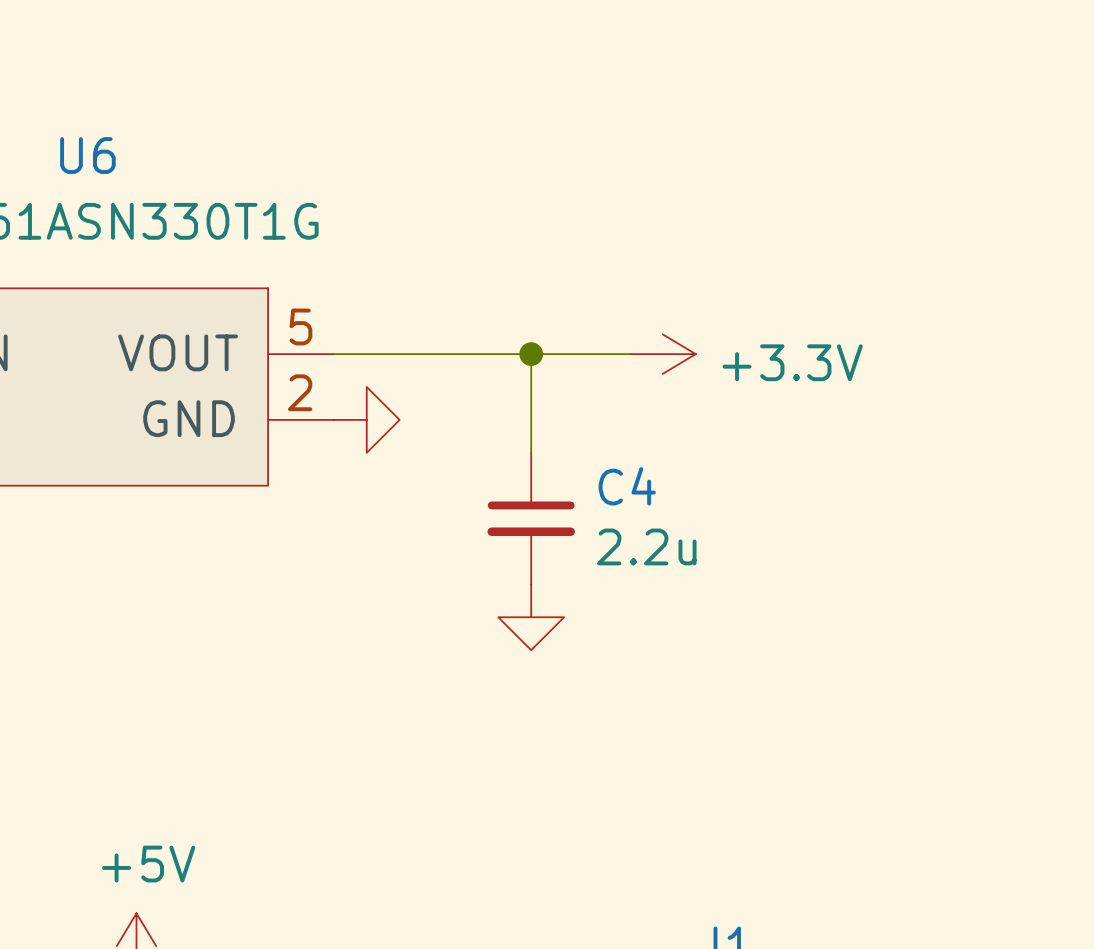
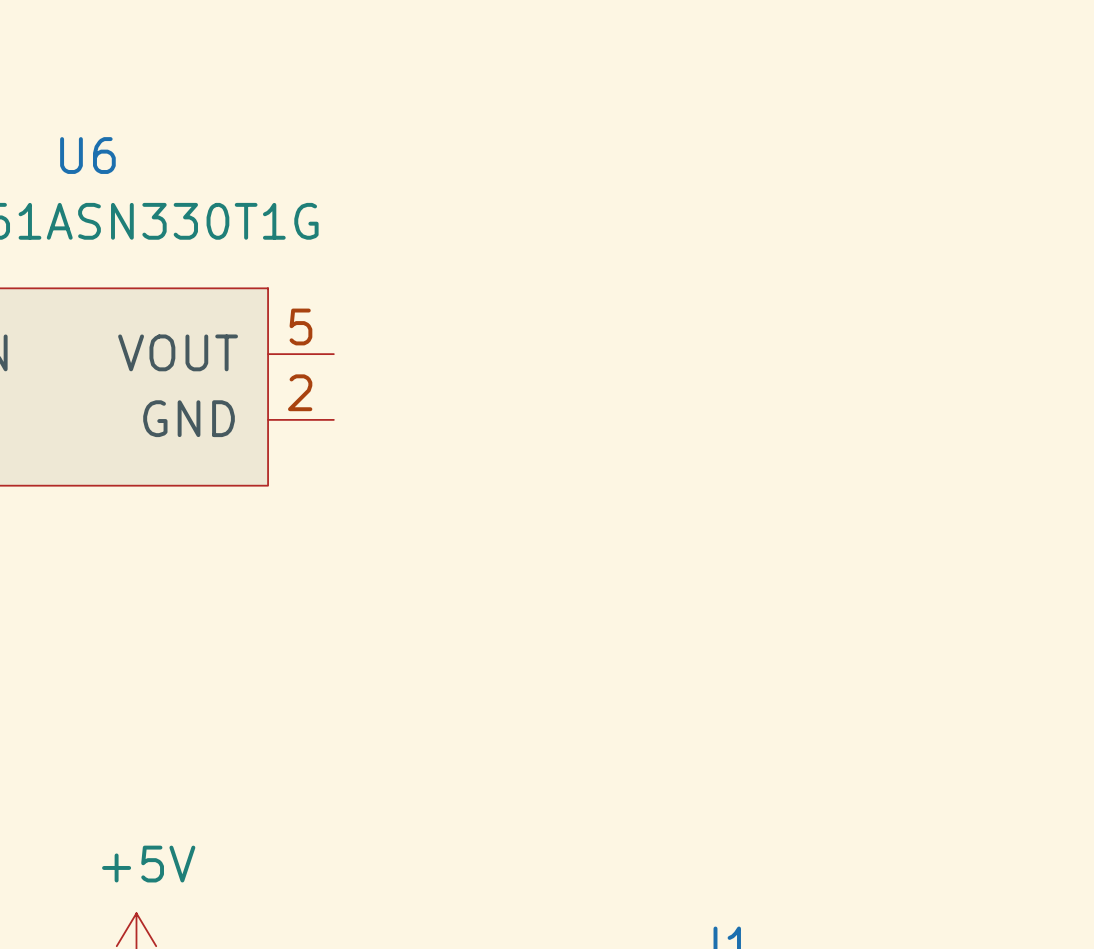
wire: (333, 354) (629, 354) -> none
wire: (531, 354) (531, 452) -> none
junction: (531, 354) -> none
power symbol: +3.3V (662, 354) -> none
power symbol: (366, 419) -> none
C4: 2.2u (531, 518) -> none
power symbol: (531, 617) -> none

